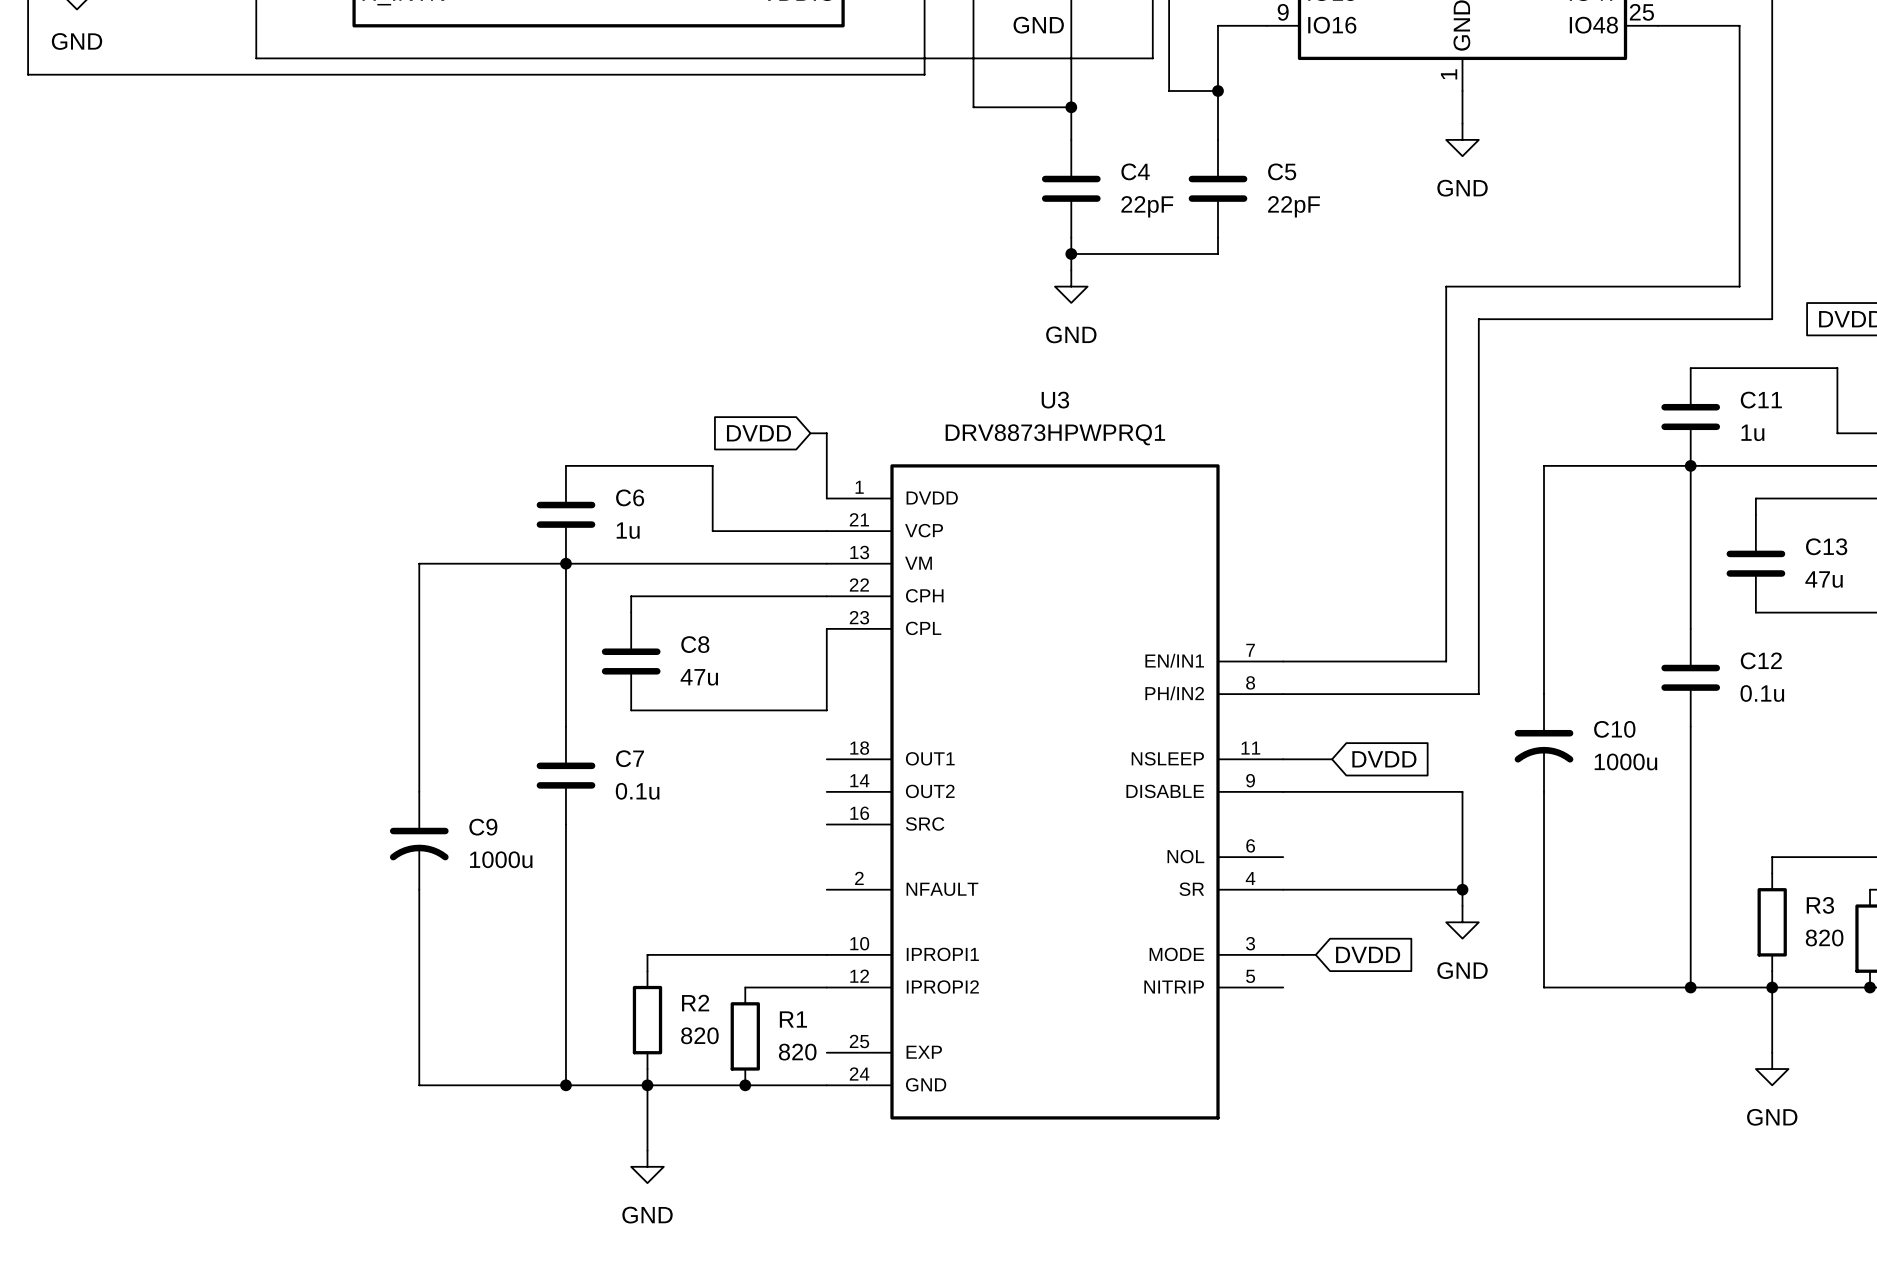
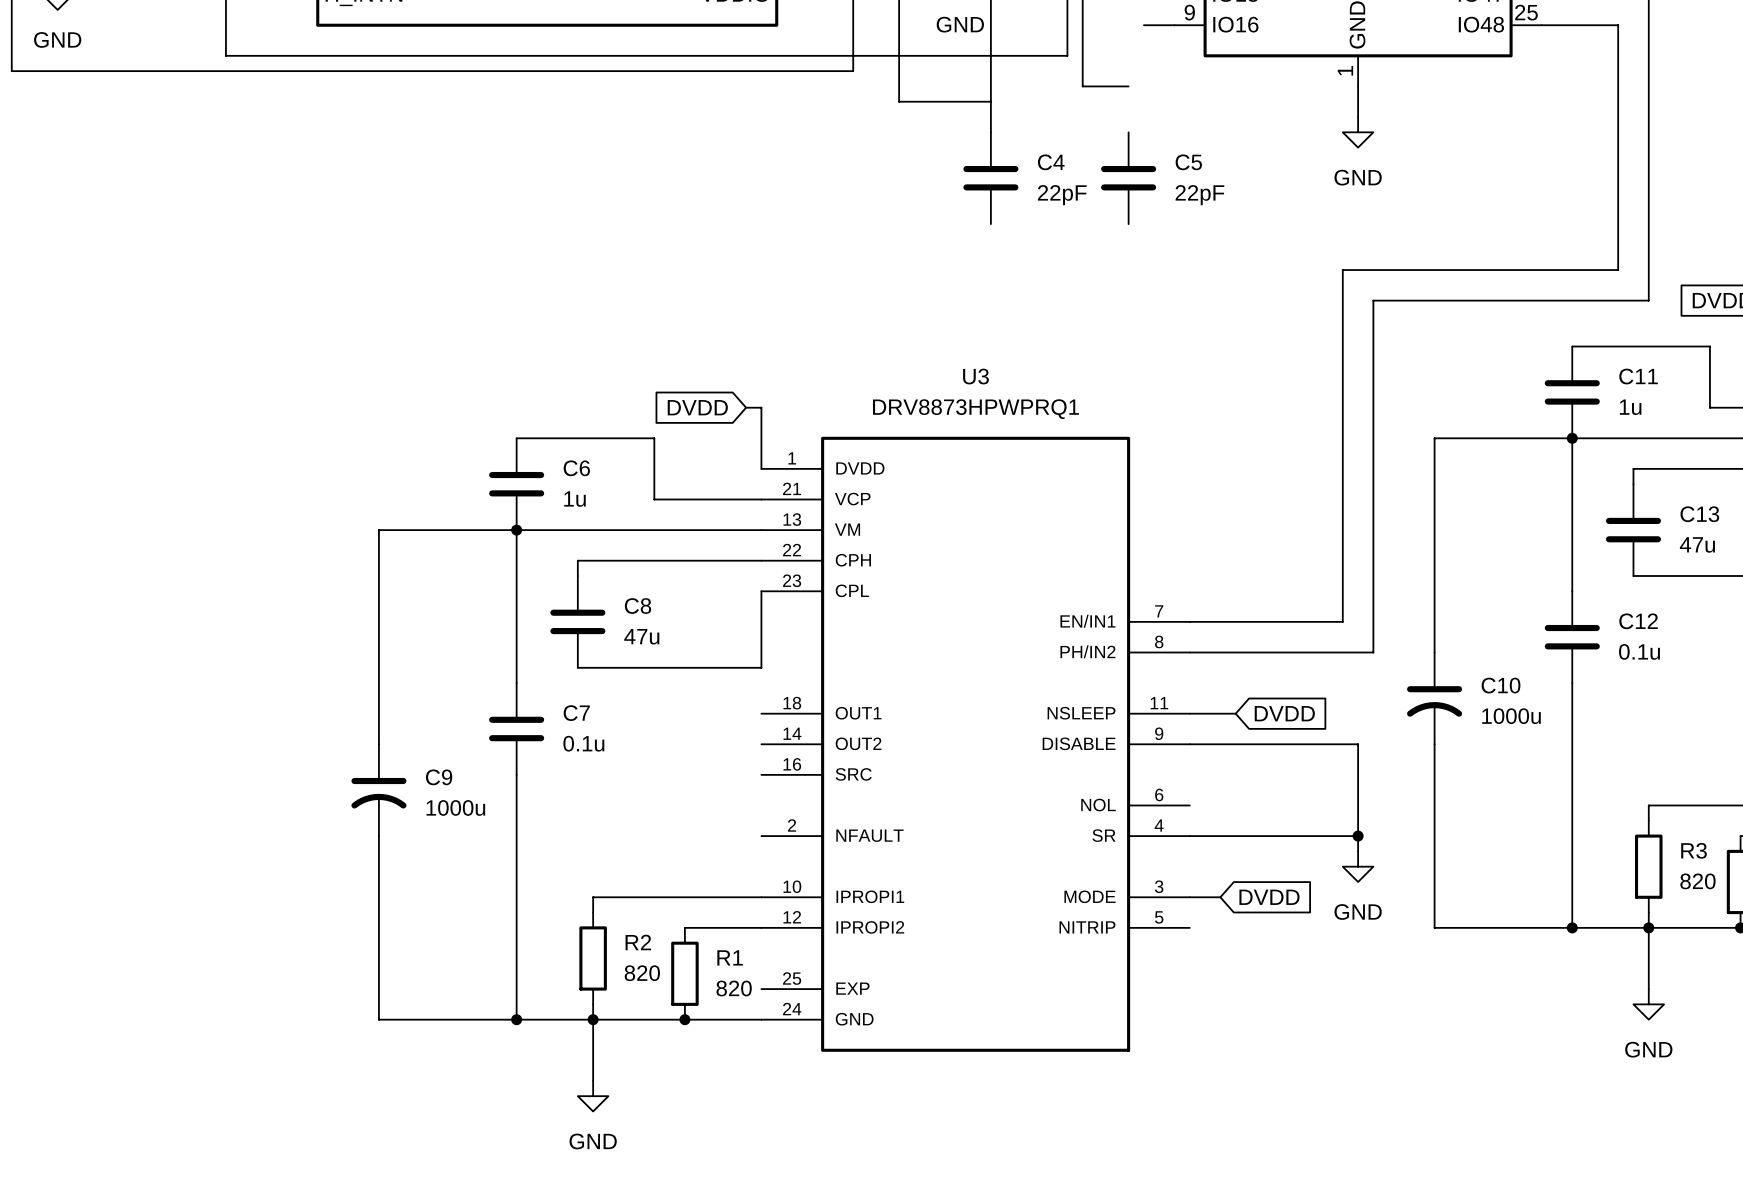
wire: (1234, 25) (1218, 25) (1218, 139) -> none
junction: (1218, 91) -> none
junction: (1071, 107) -> none
wire: (1071, 237) (1071, 270) -> none
wire: (1218, 237) (1218, 254) (1071, 254) -> none
junction: (1071, 254) -> none
power symbol: GND (1071, 286) -> none

